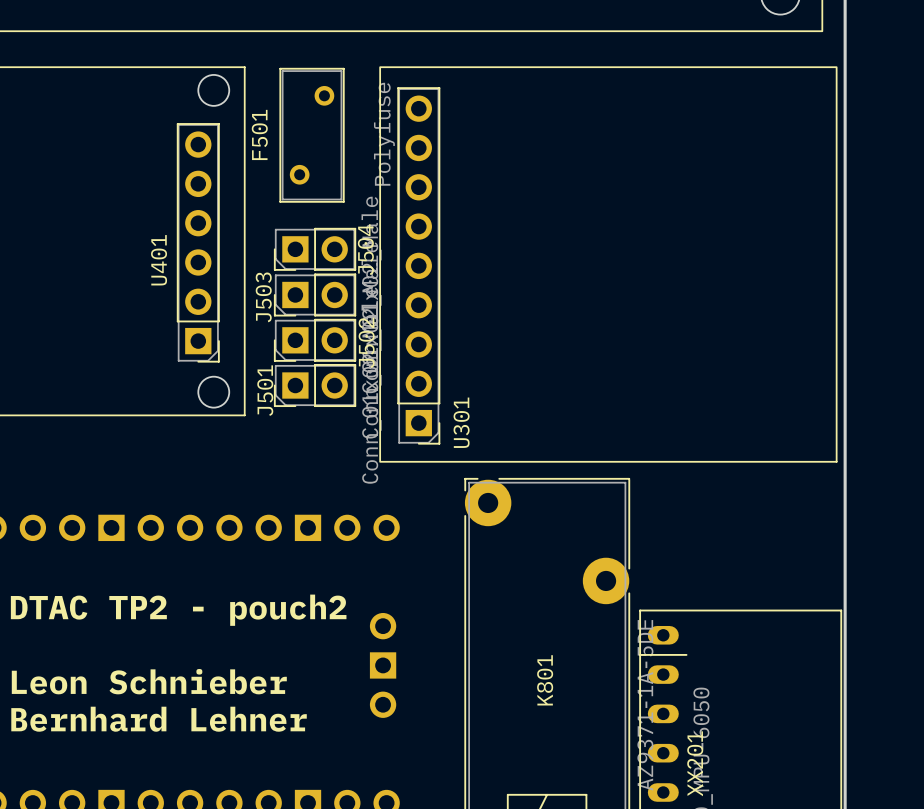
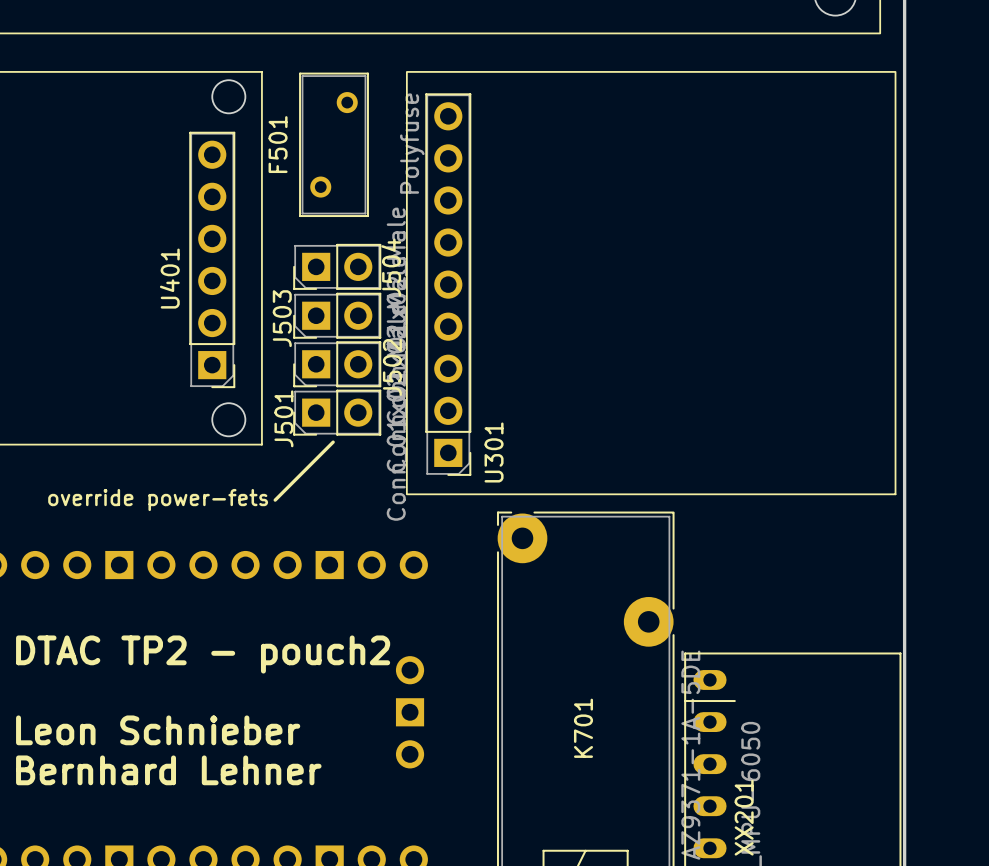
line: none -> (333, 442) (275, 500)
text: none -> override power-fets (158, 500)
K801 name: K801 (545, 680) -> K701 (583, 728)

